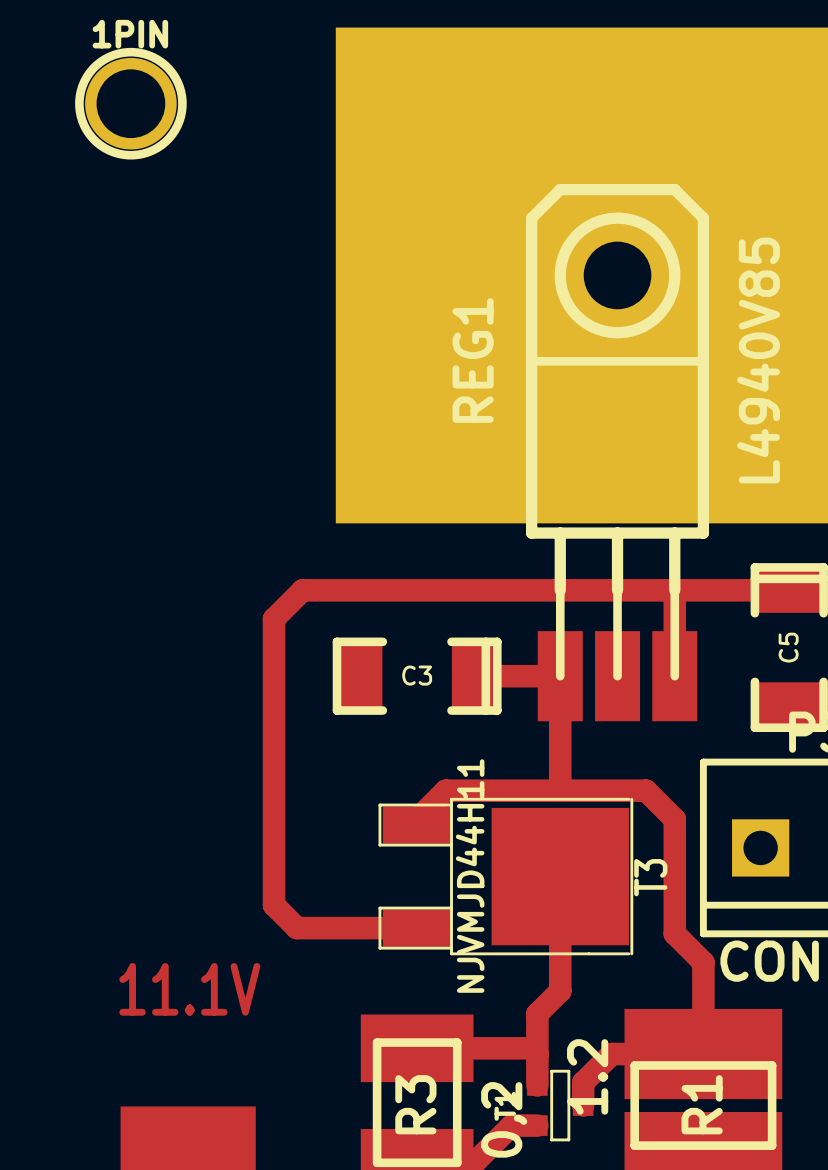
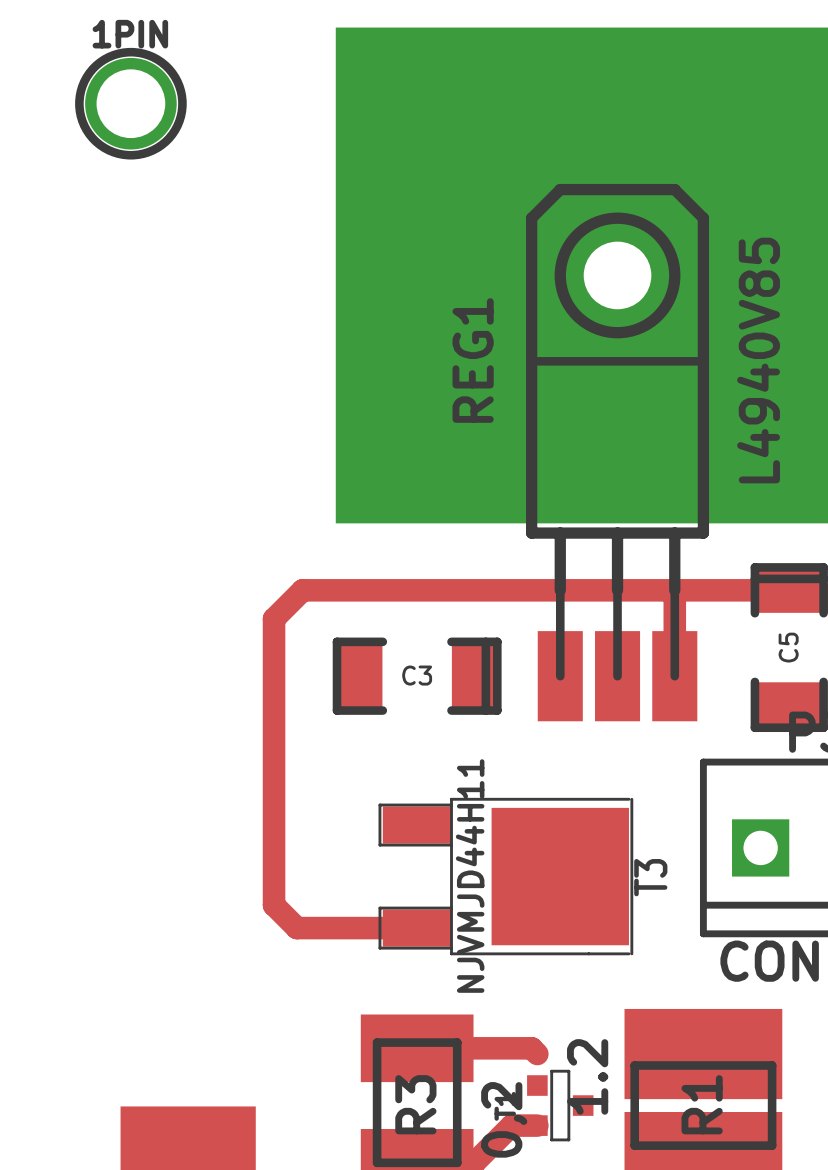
top track: (474, 676) (560, 676) (560, 790) -> none
top track: (417, 825) (417, 819) (445, 790) (646, 790) (674, 819) (674, 933) (703, 962) (703, 1054) (611, 1054) (583, 1082) (583, 1105) -> none
top track: (560, 876) (560, 991) (537, 1013) (537, 1085) -> none
text: 11.1V (189, 989) -> none

